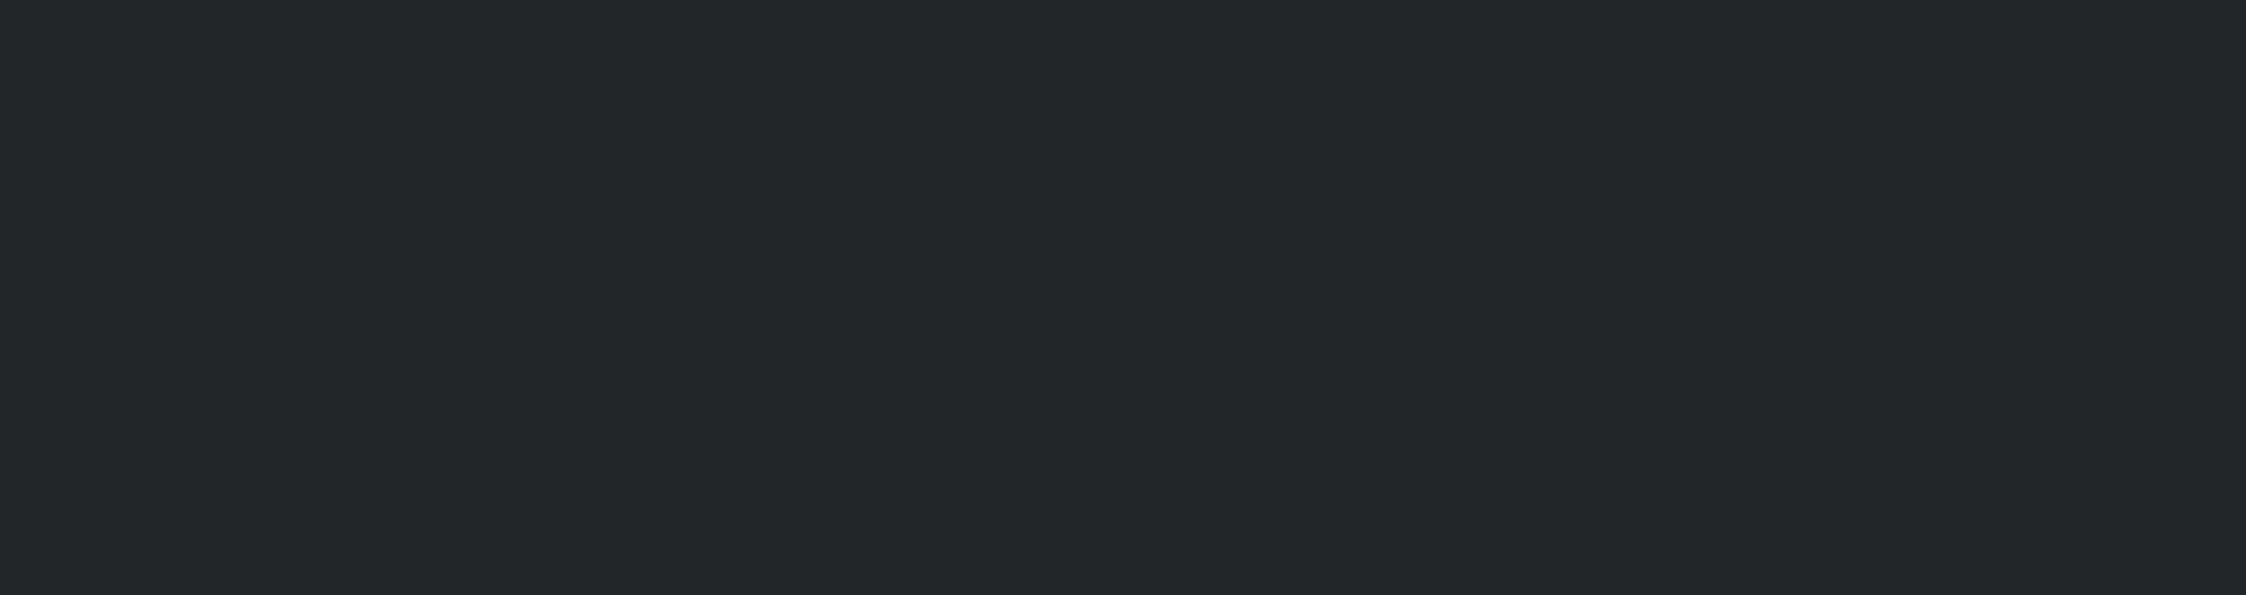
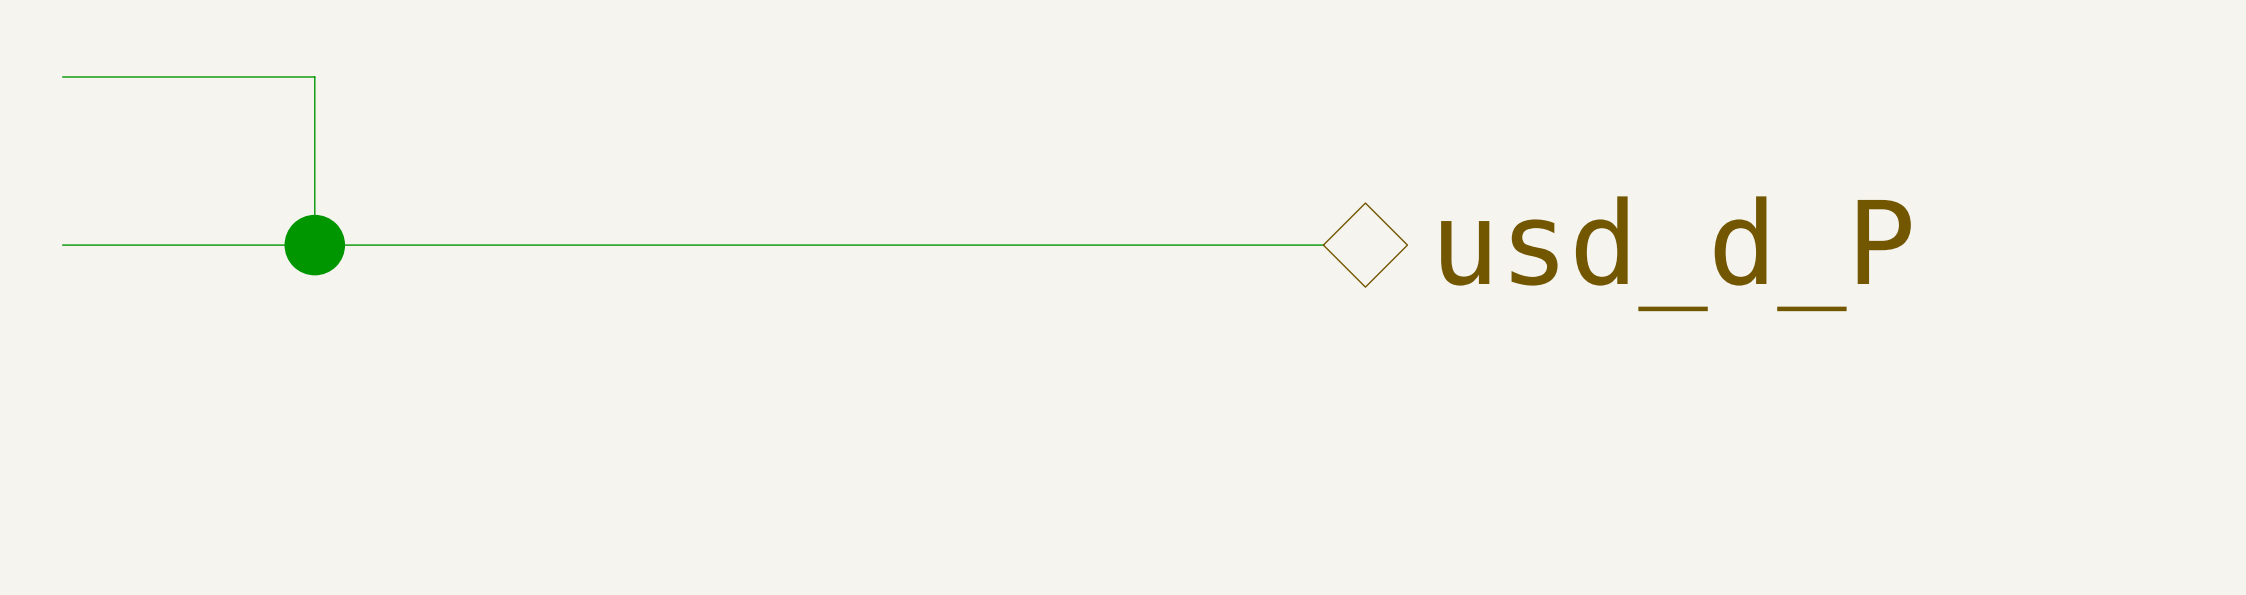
wire: none -> (62, 76) (314, 76) (314, 245)
wire: none -> (62, 245) (1323, 245)
junction: none -> (314, 245)
hierarchical label: none -> usd_d_P (1675, 253)

